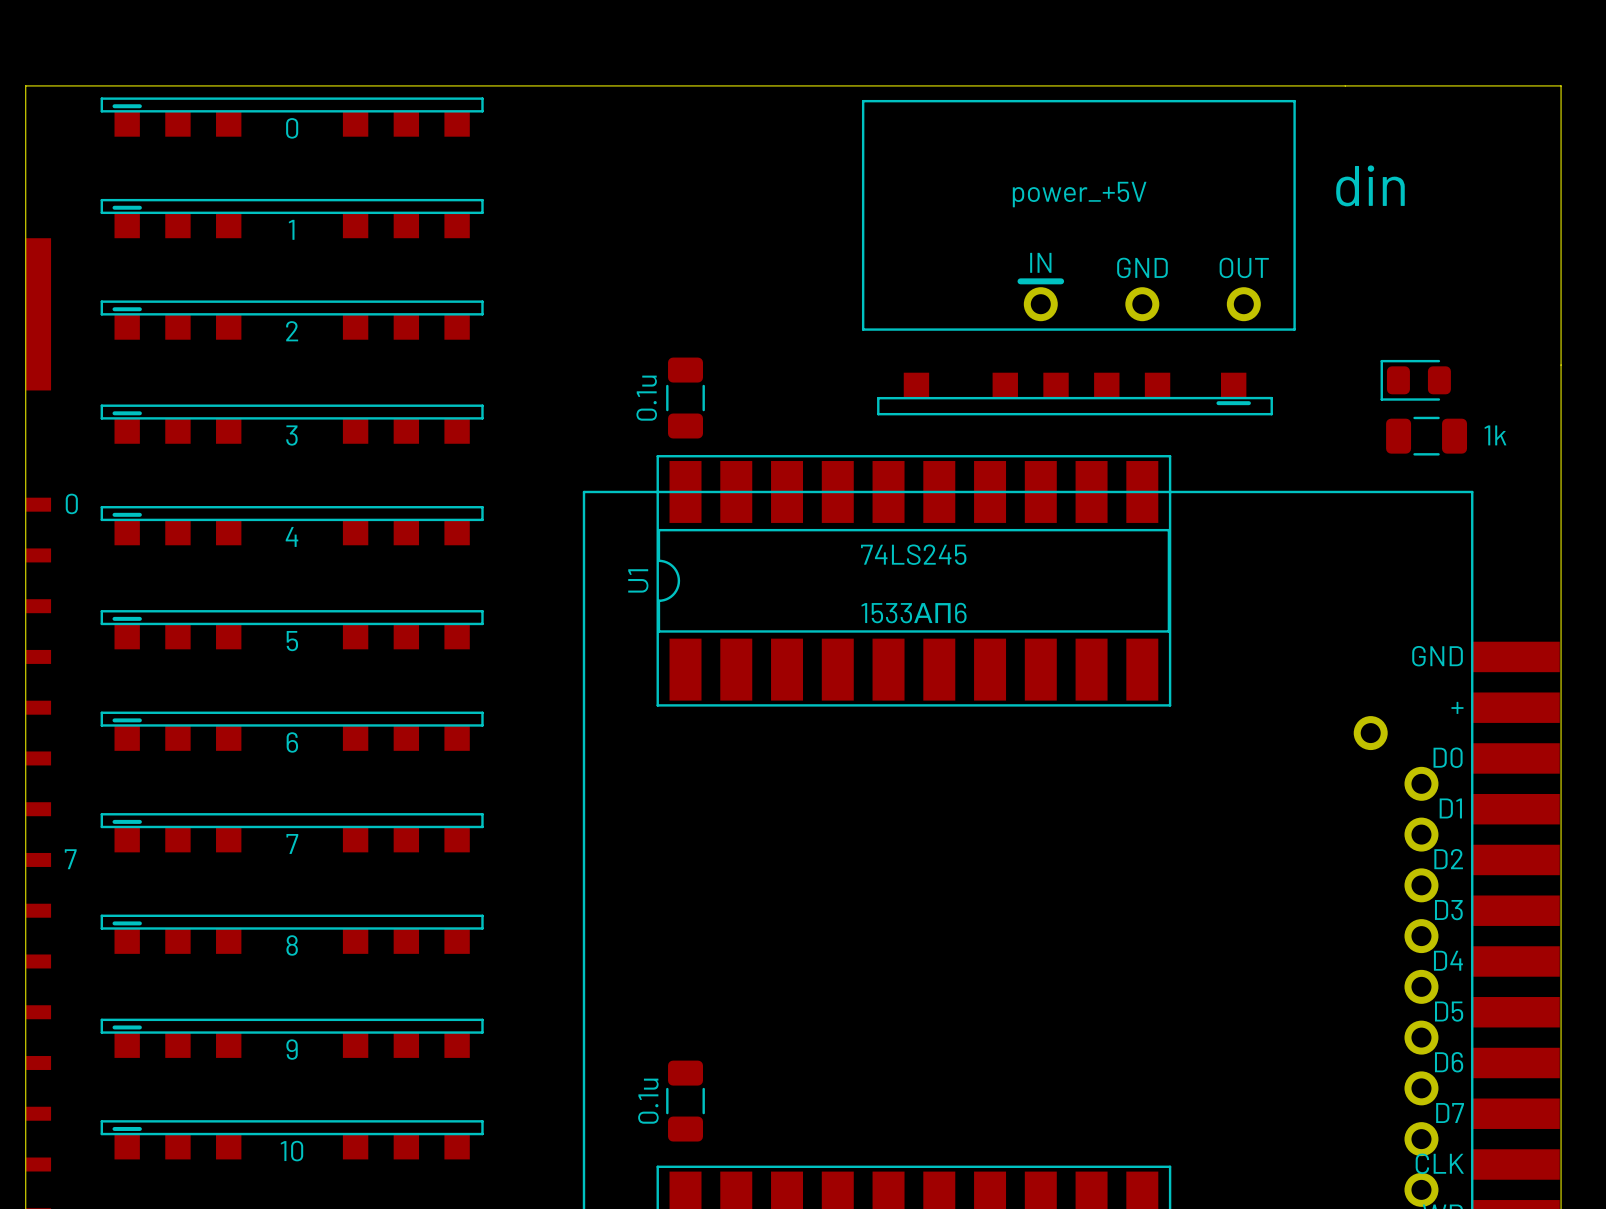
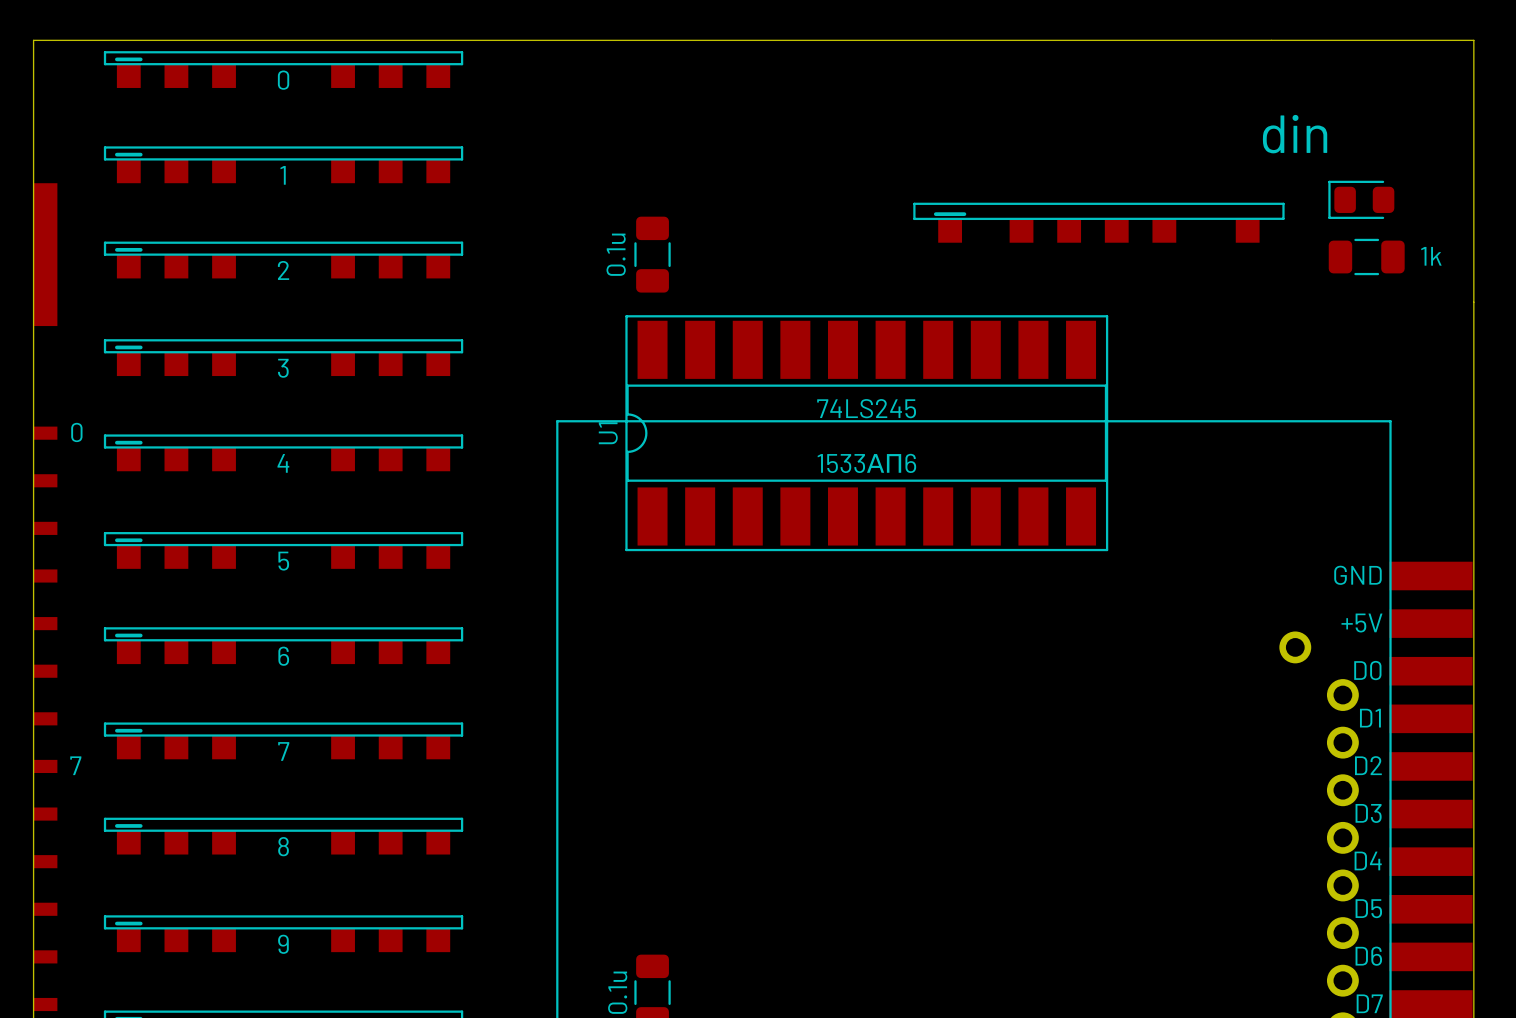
part: power_+5V (1078, 215) -> none
part position: (1415, 380) -> (1361, 199)
part rotation: 0° (1075, 394) -> 180° (1098, 222)
part position: (685, 398) -> (652, 254)
part position: (1426, 436) -> (1366, 257)
U1 position: (913, 580) -> (866, 433)
part text: + (1457, 707) -> +5V (1361, 623)

